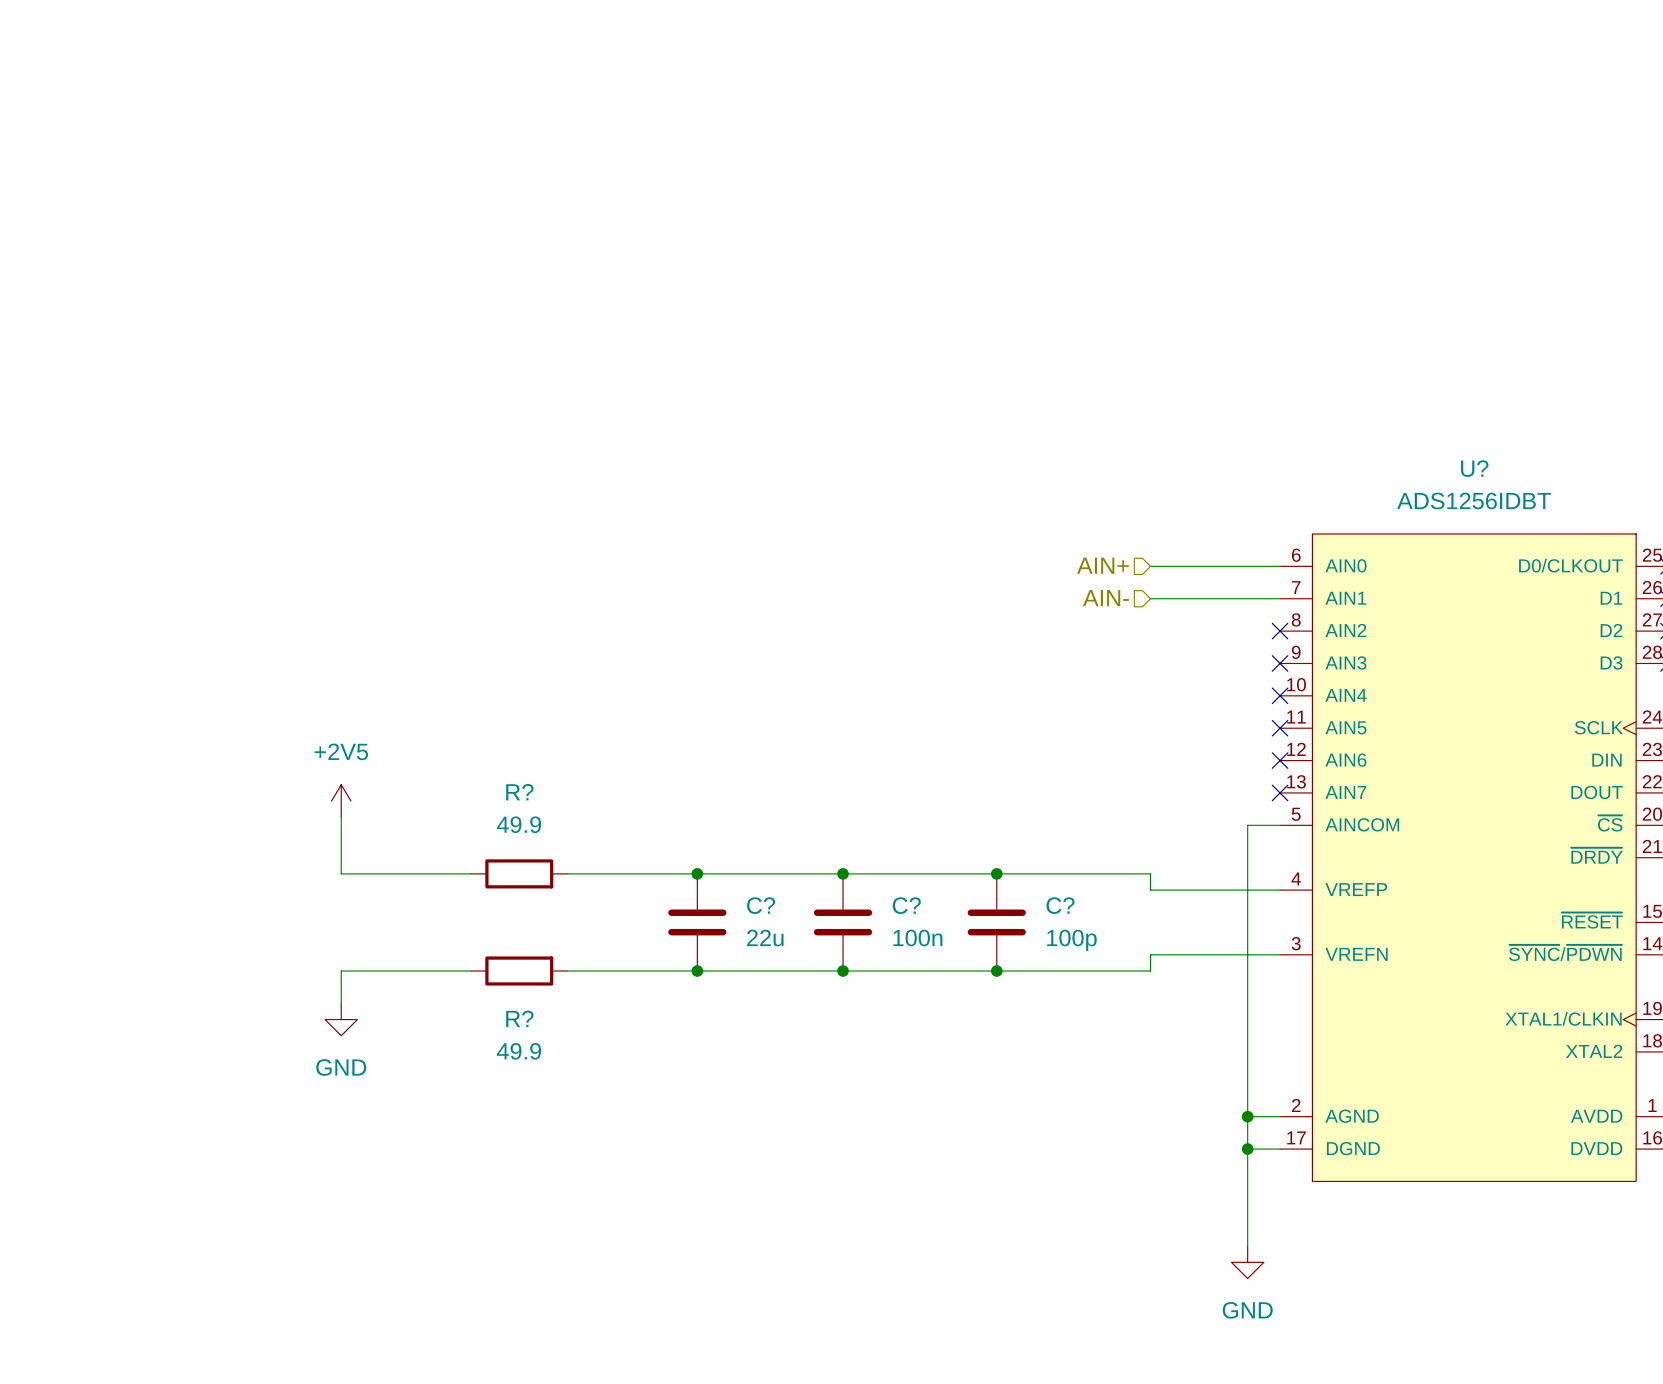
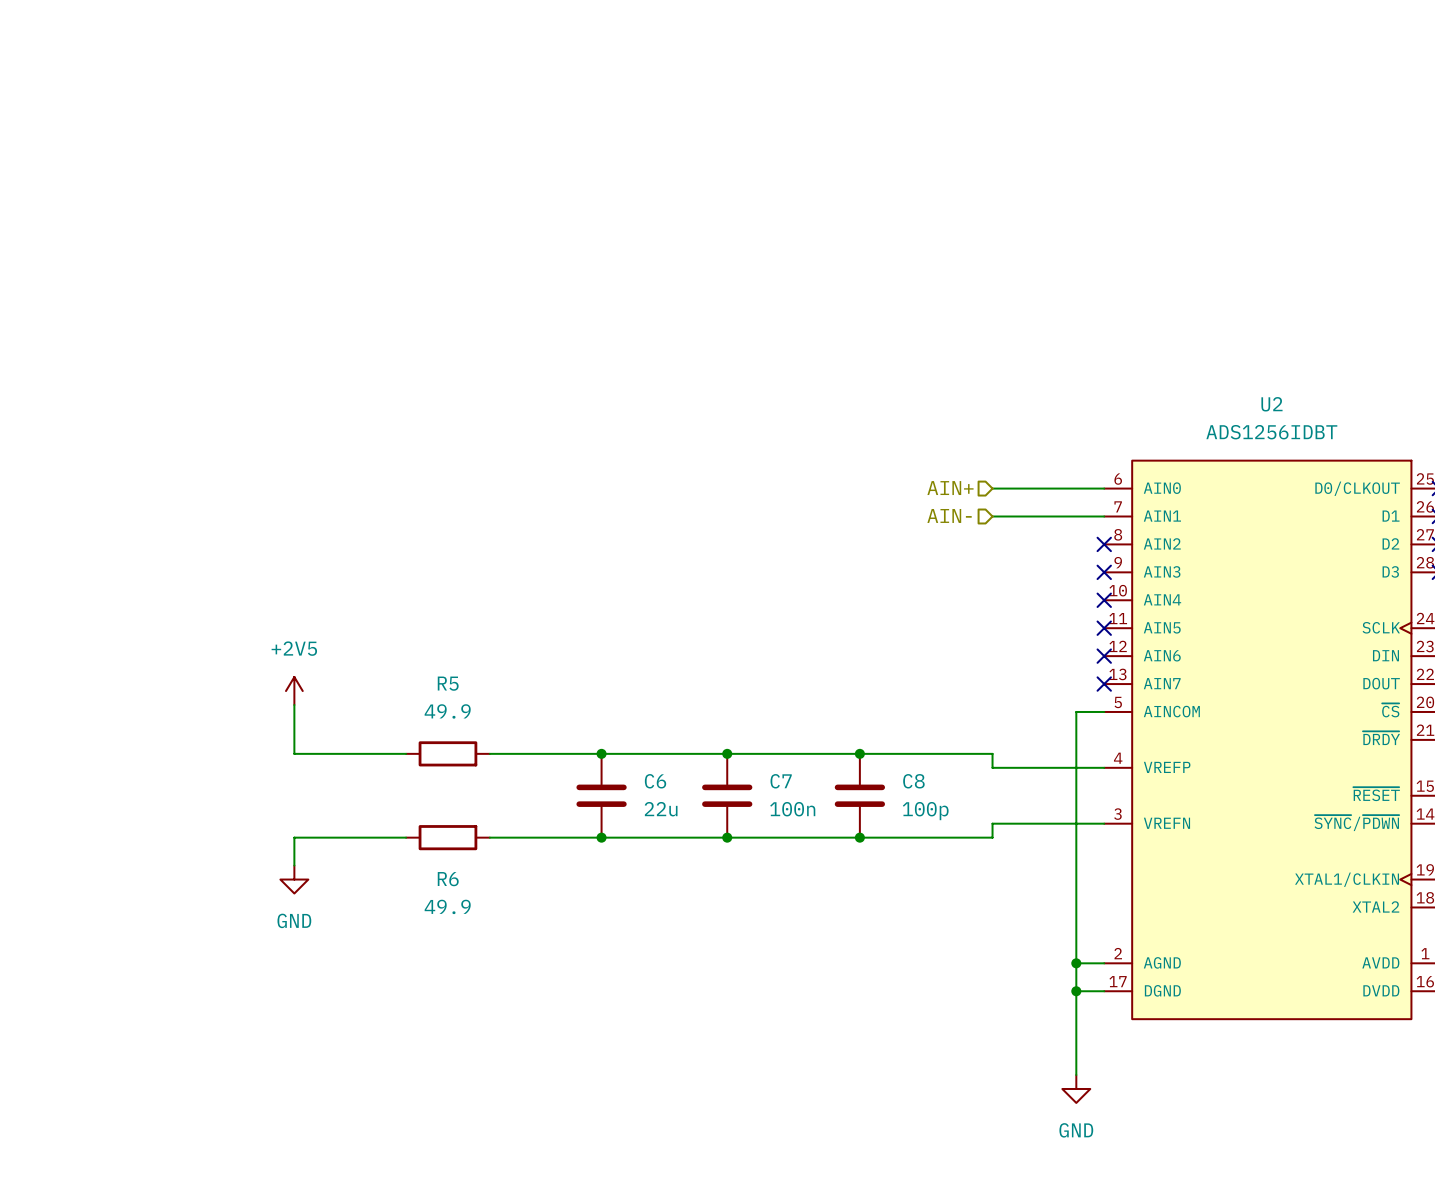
U? name: U? (1474, 468) -> U2 (1271, 404)
R? name: R? (519, 792) -> R5 (448, 683)
C? name: C? (761, 905) -> C6 (655, 781)
C? name: C? (906, 905) -> C7 (781, 781)
C? name: C? (1060, 905) -> C8 (913, 781)
R? name: R? (519, 1018) -> R6 (448, 879)

